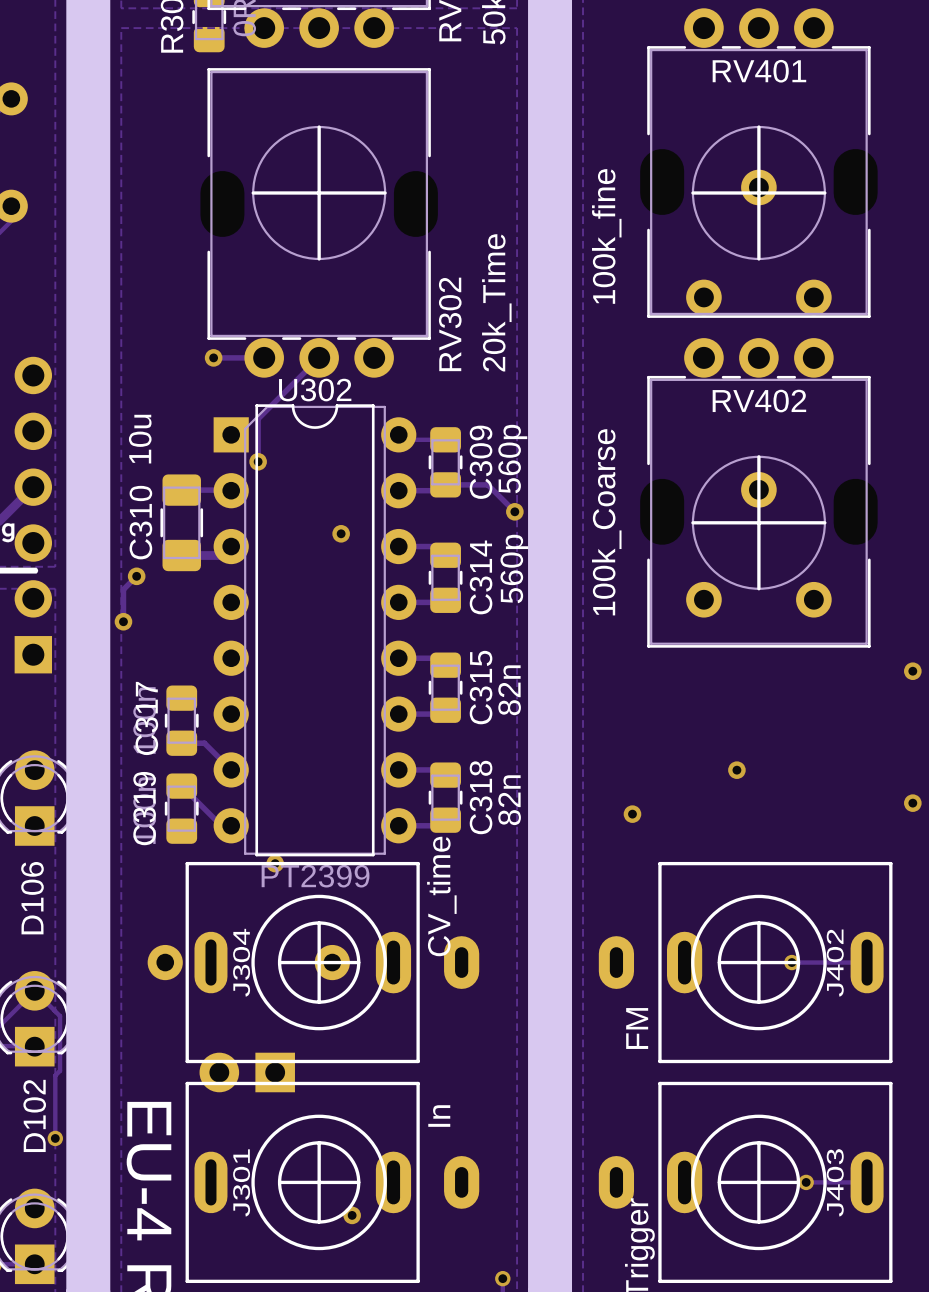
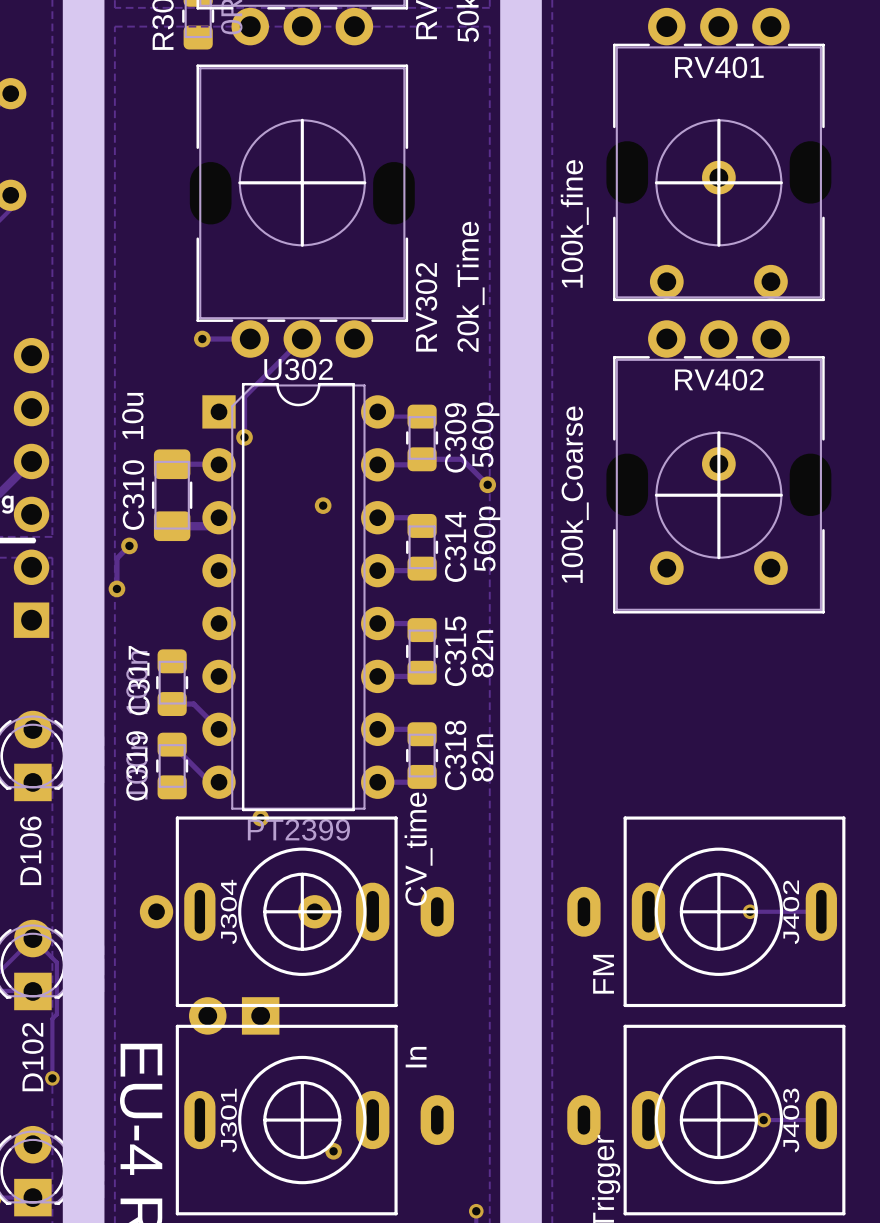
via: (912, 671) -> none
via: (736, 770) -> none
via: (912, 803) -> none
via: (632, 814) -> none

